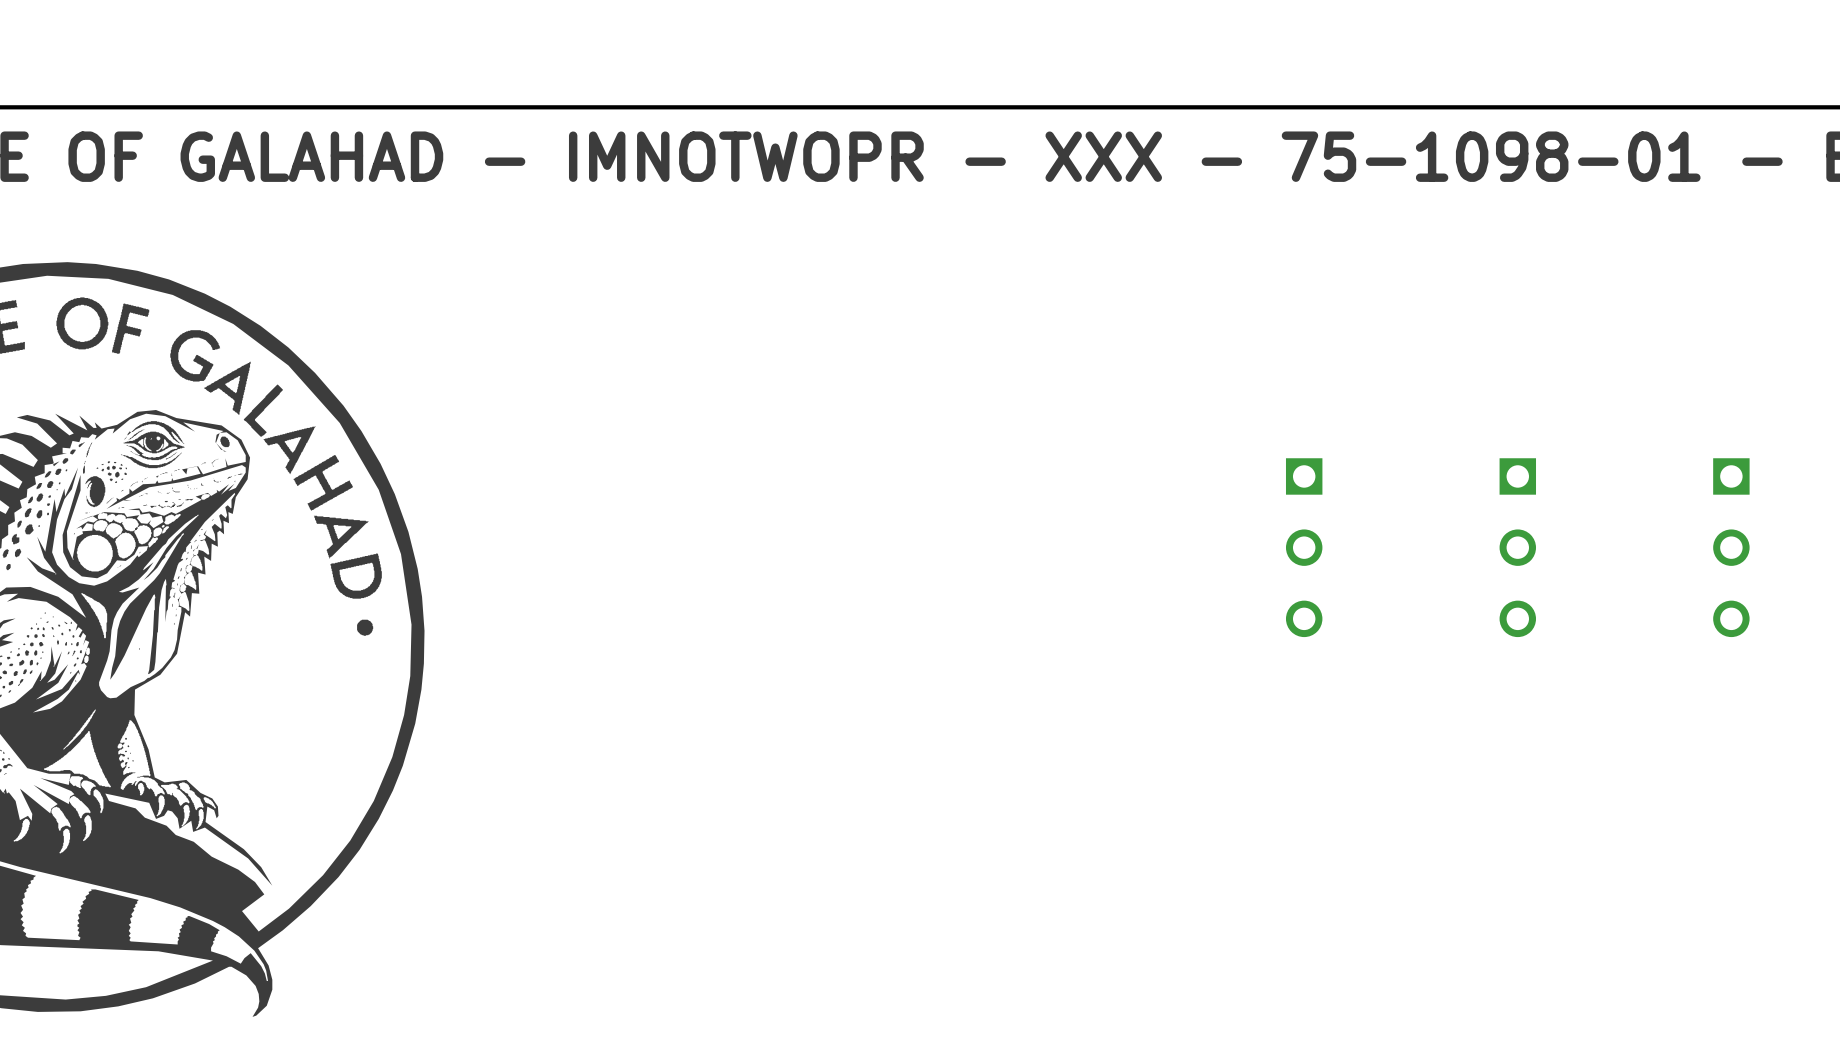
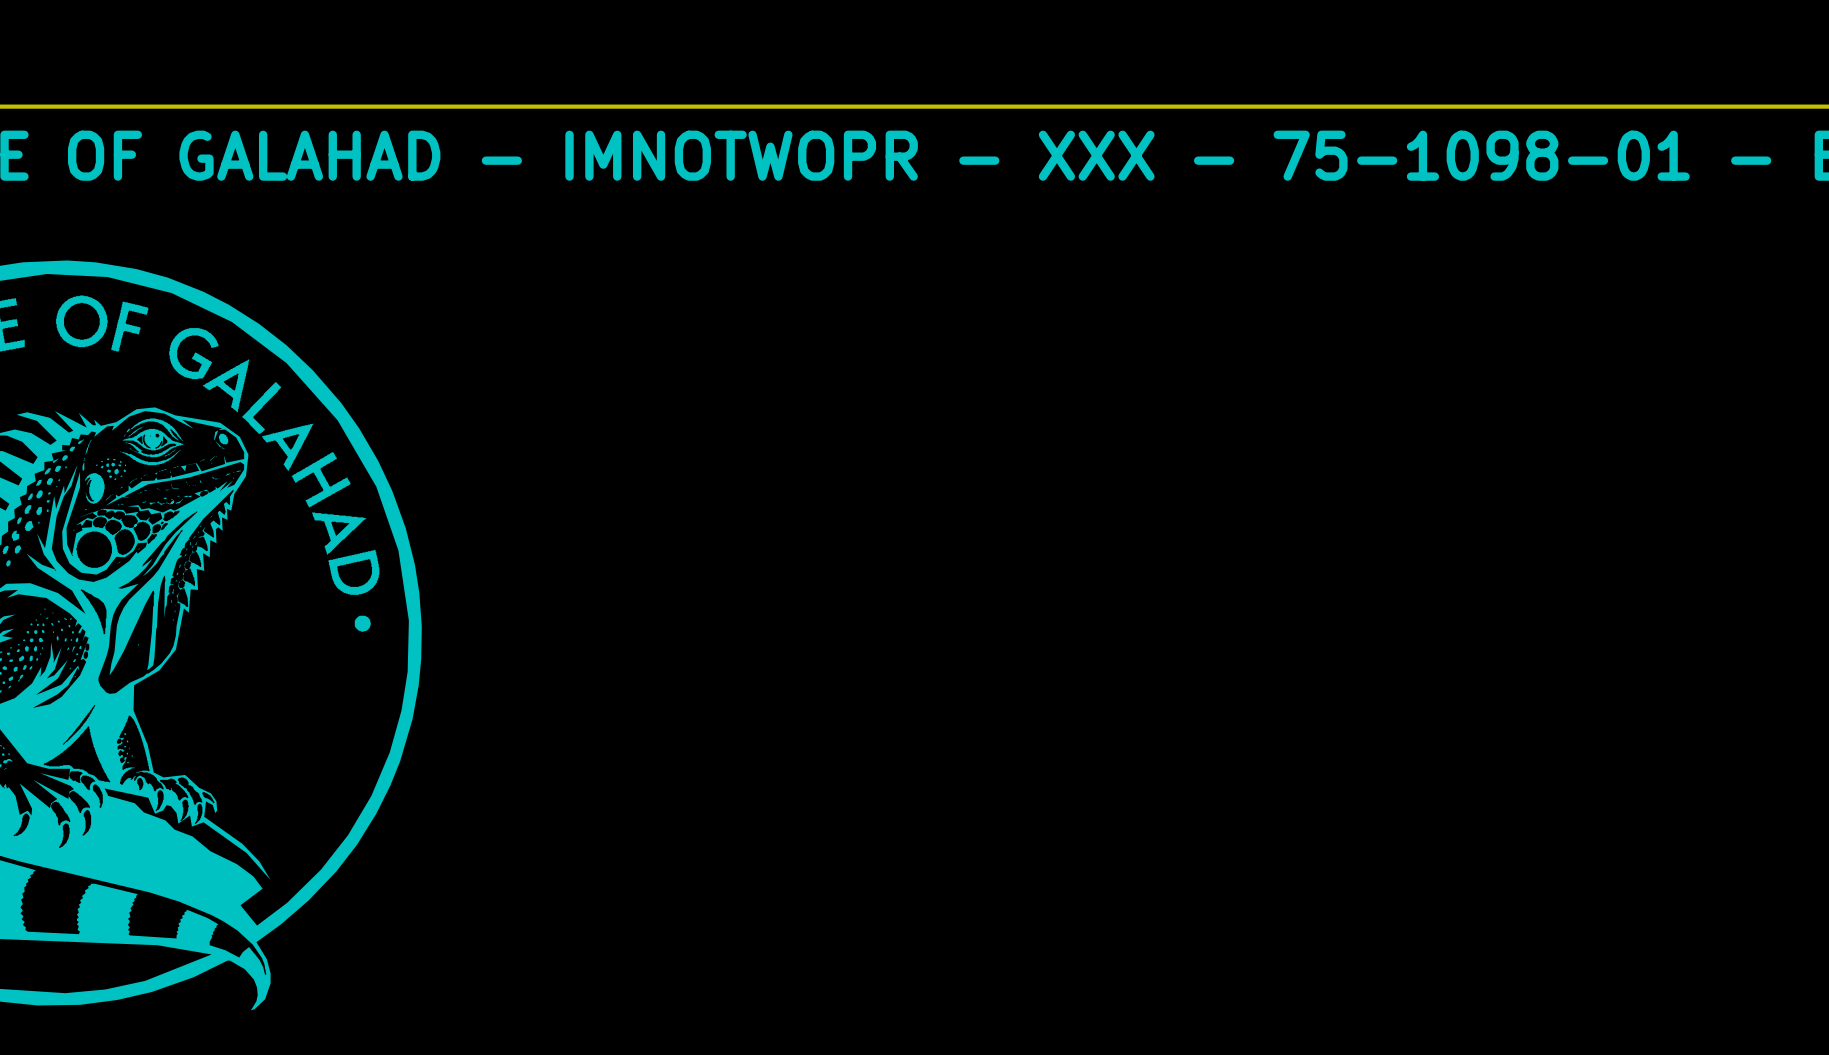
part: (1304, 547) -> none
part: (1517, 547) -> none
part: (1731, 547) -> none

